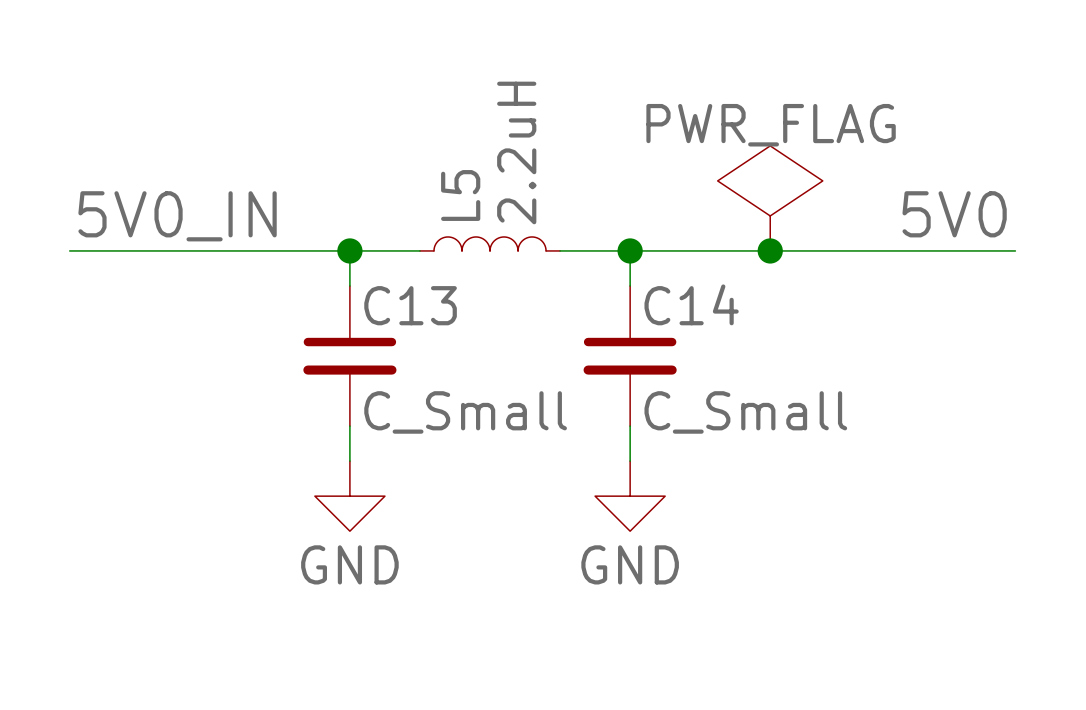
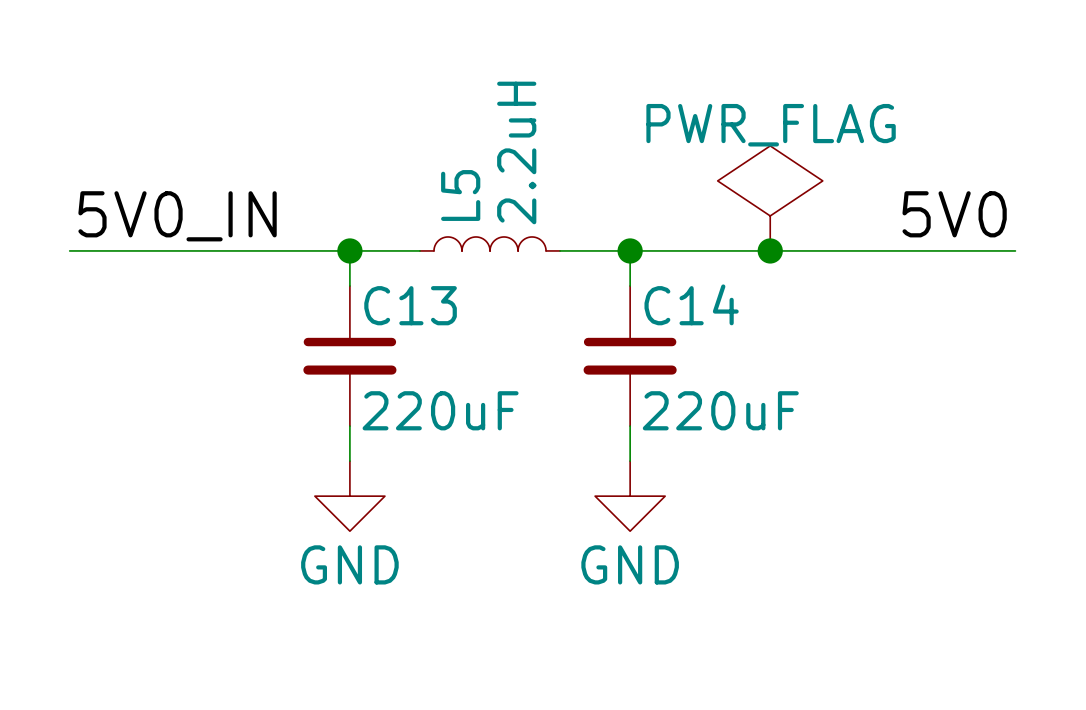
C13 value: C_Small (465, 412) -> 220uF (440, 410)
C14 value: C_Small (745, 412) -> 220uF (720, 410)

